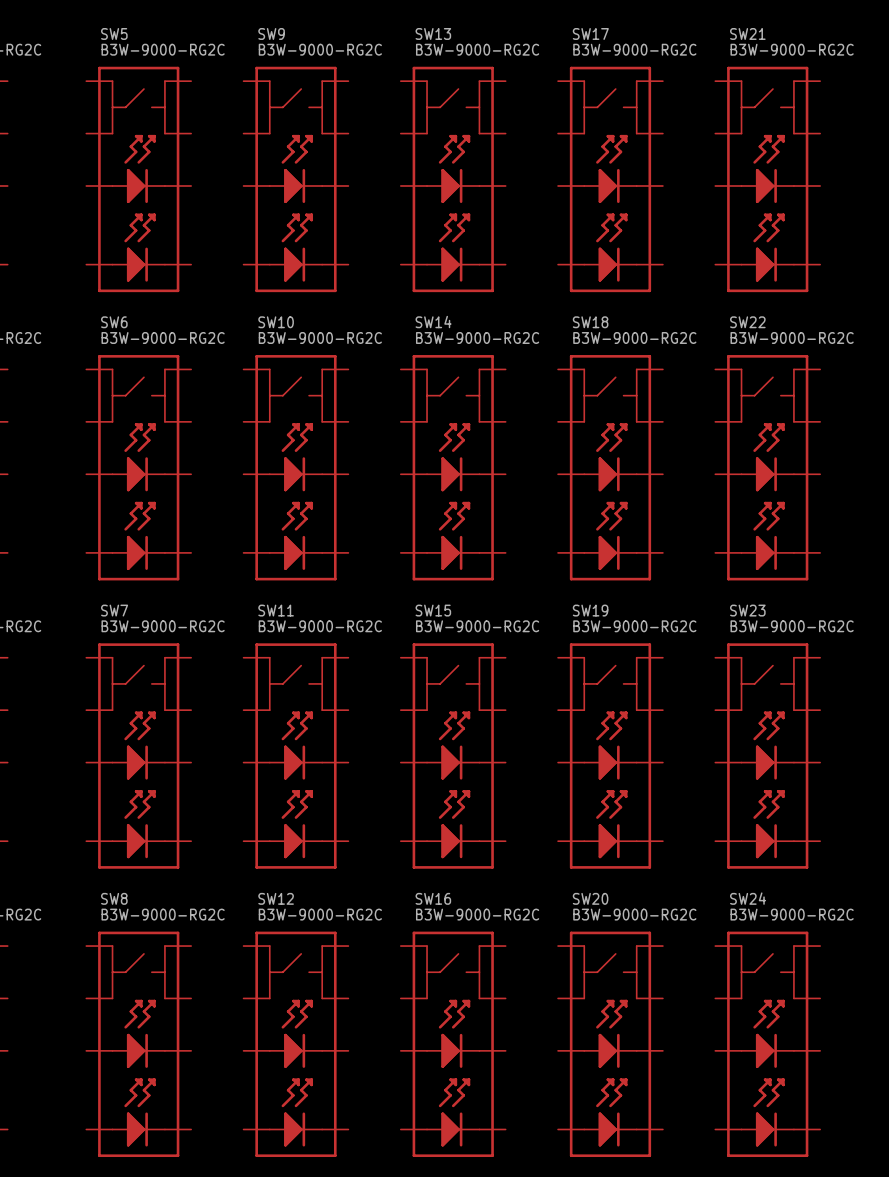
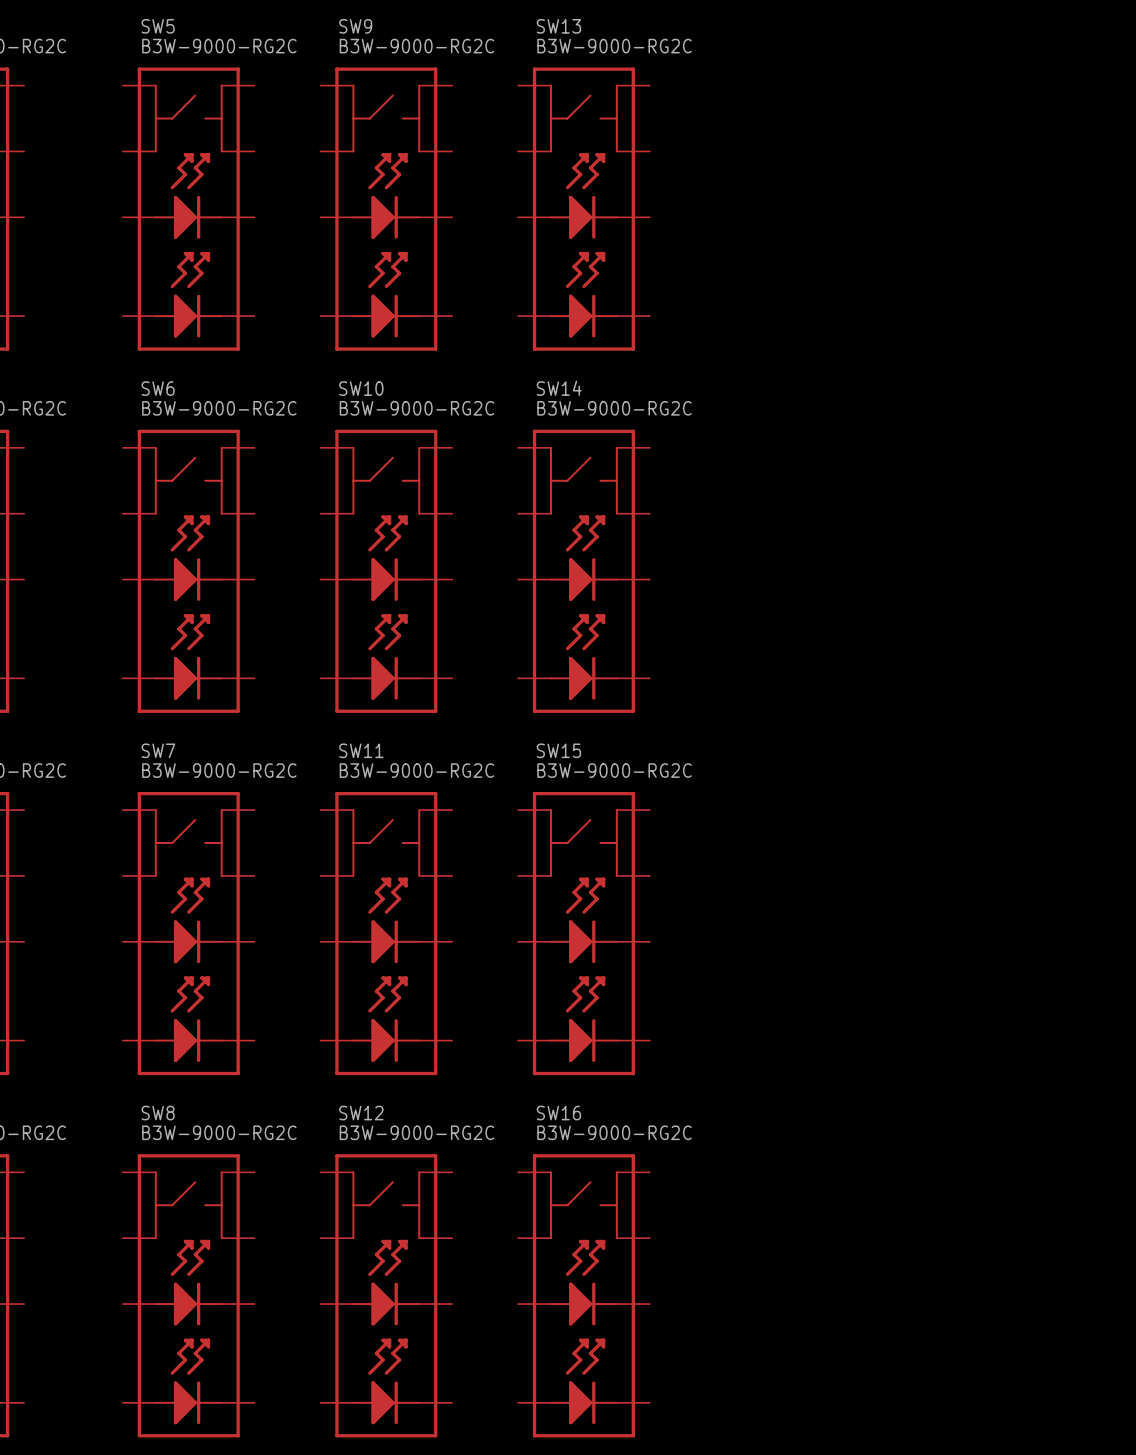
SW17: B3W-9000-RG2C (610, 179) -> none
SW21: B3W-9000-RG2C (767, 179) -> none
SW18: B3W-9000-RG2C (610, 467) -> none
SW22: B3W-9000-RG2C (767, 467) -> none
SW19: B3W-9000-RG2C (610, 756) -> none
SW23: B3W-9000-RG2C (767, 756) -> none
SW20: B3W-9000-RG2C (610, 1044) -> none
SW24: B3W-9000-RG2C (767, 1044) -> none

